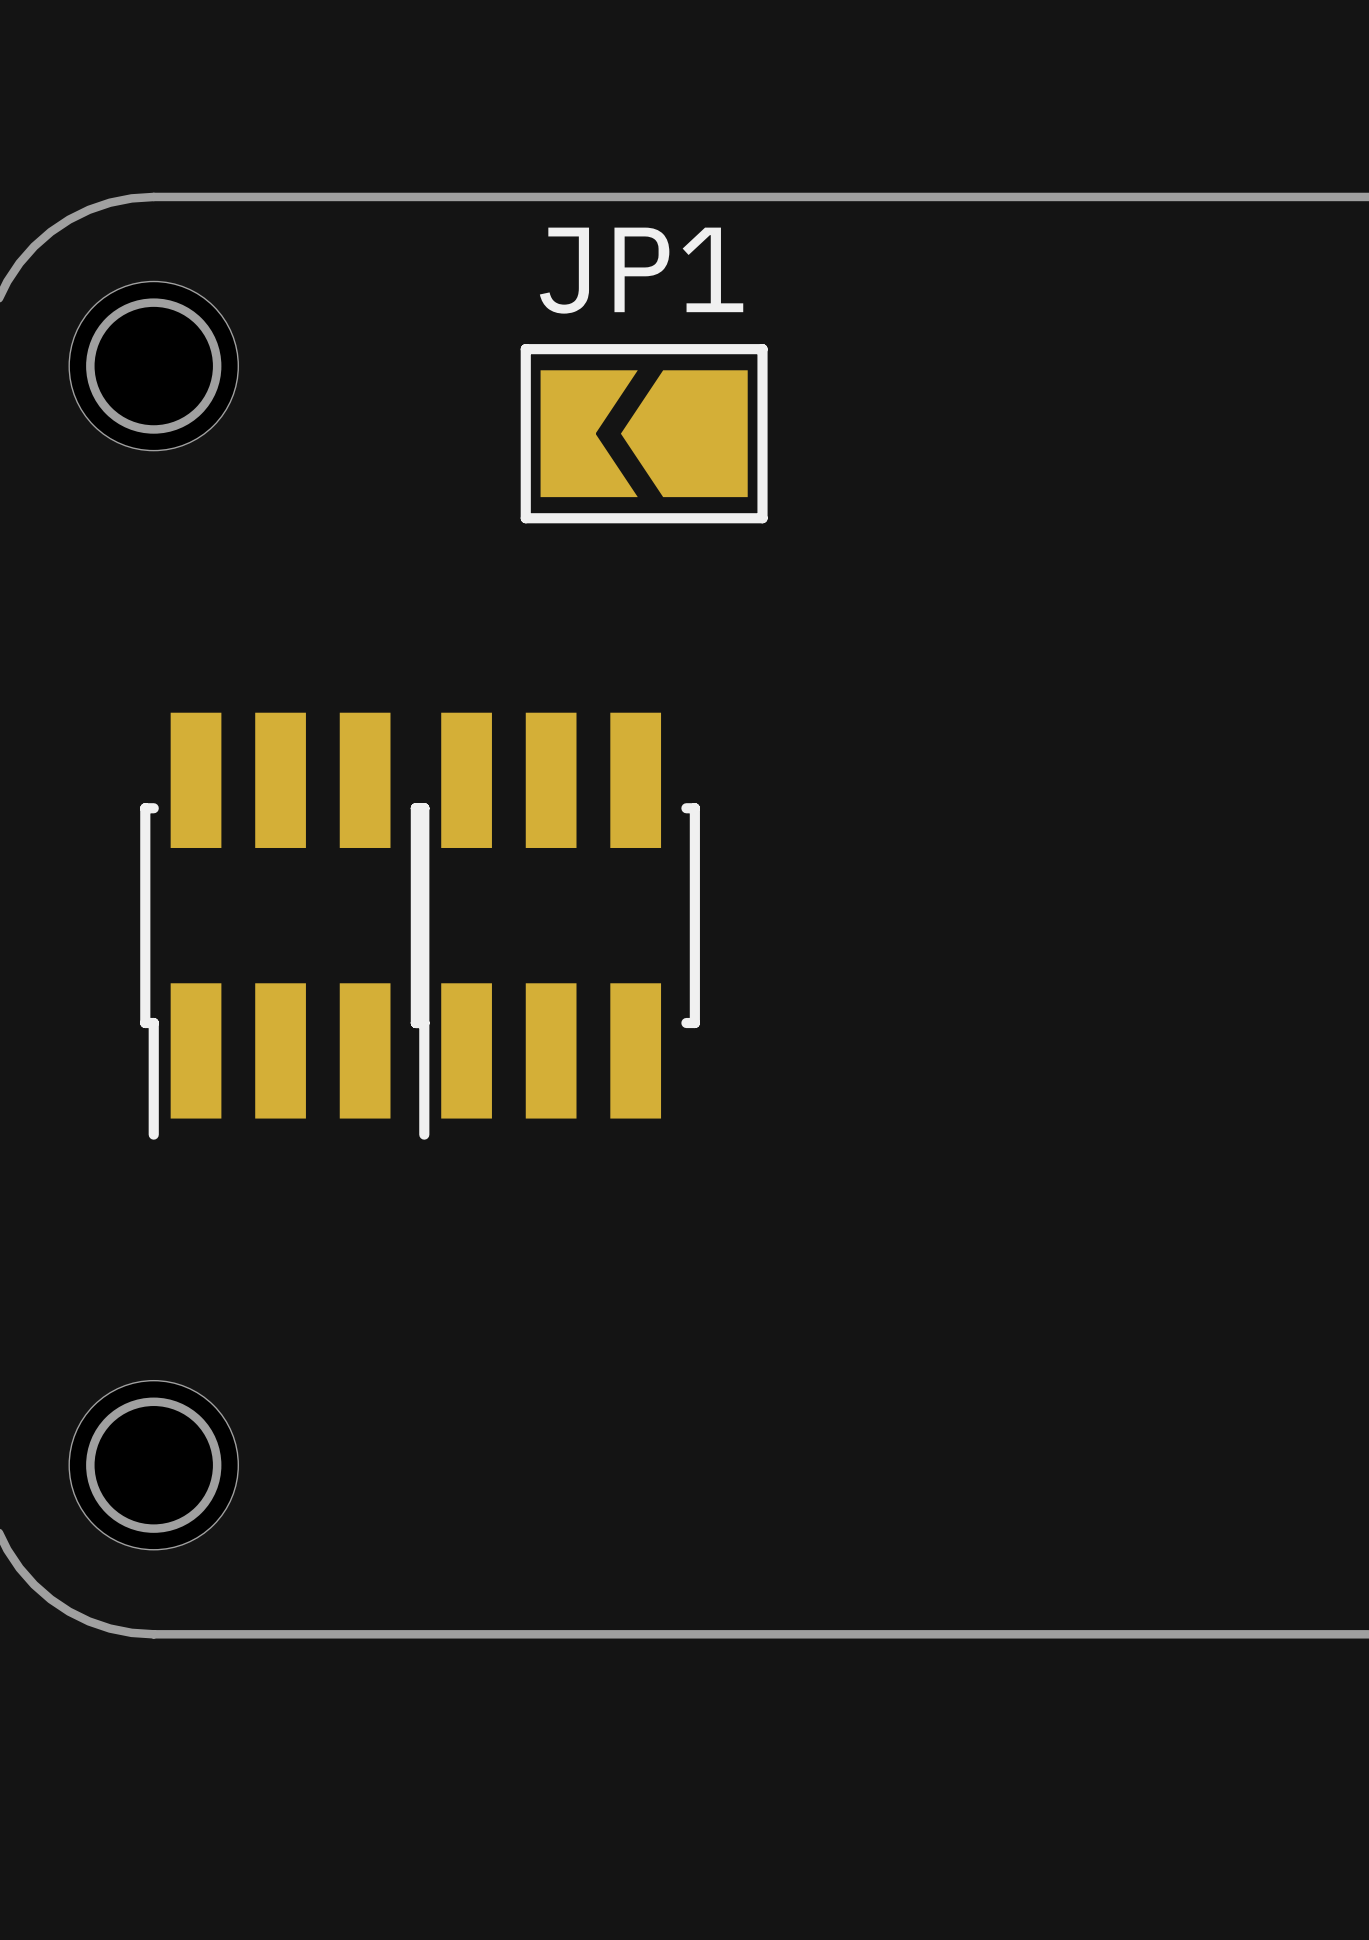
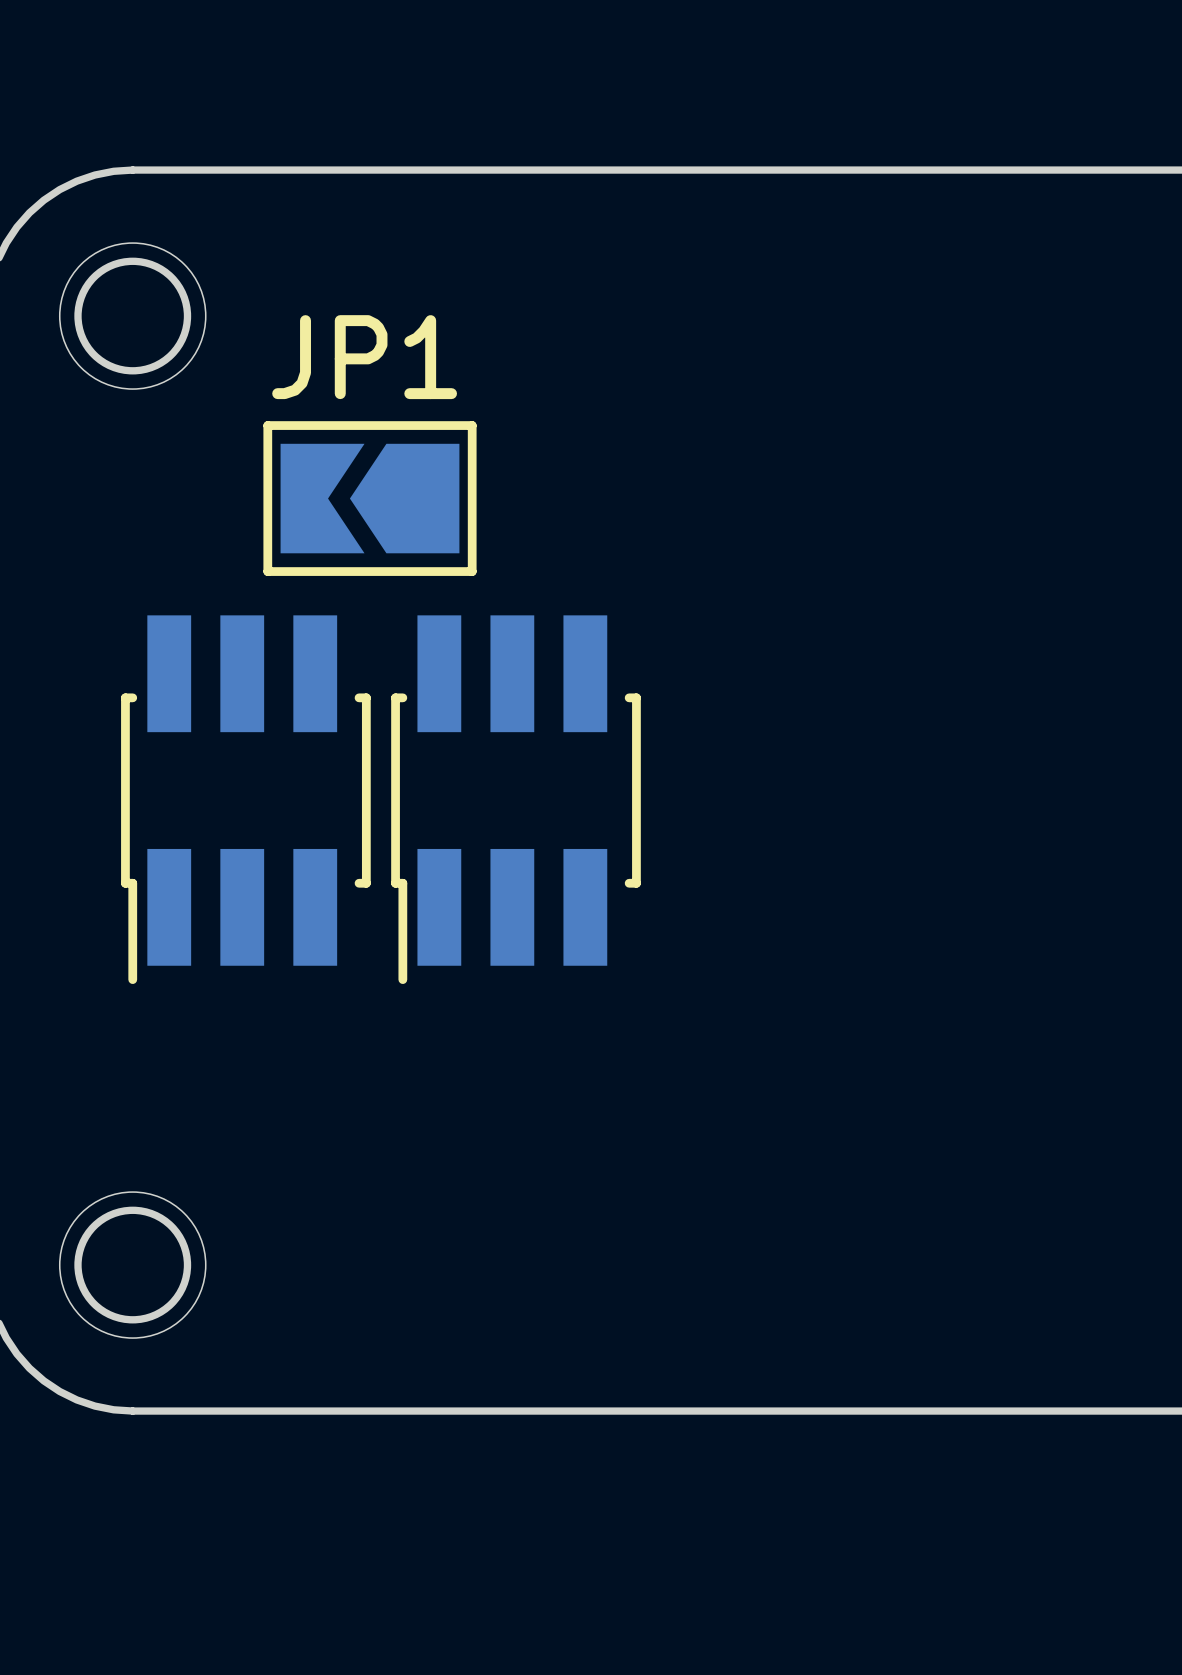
JP1 position: (644, 433) -> (369, 498)
part position: (555, 926) -> (515, 799)

